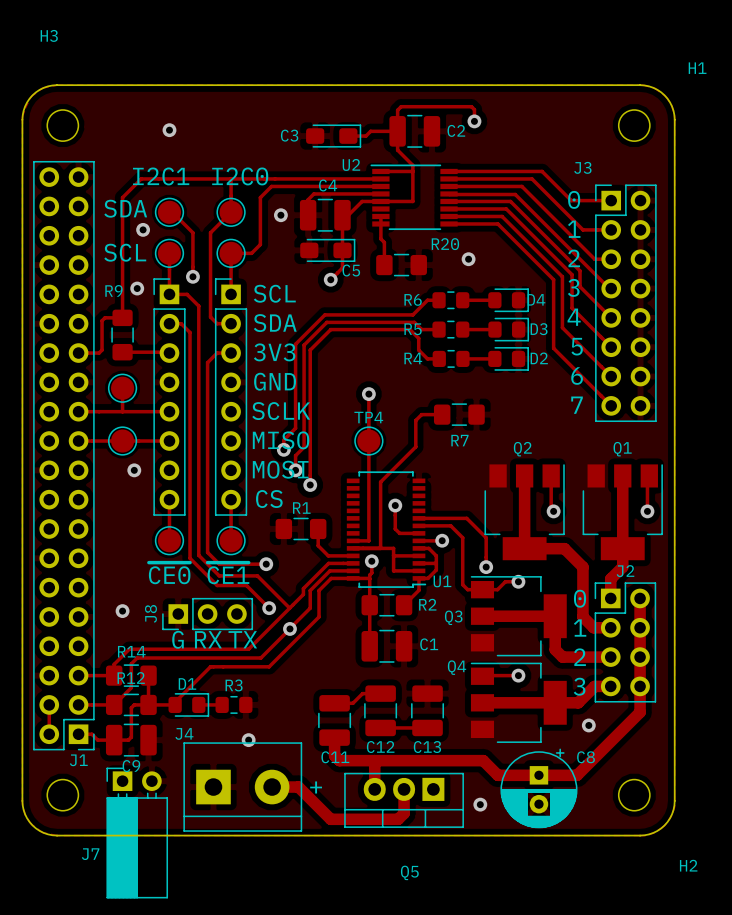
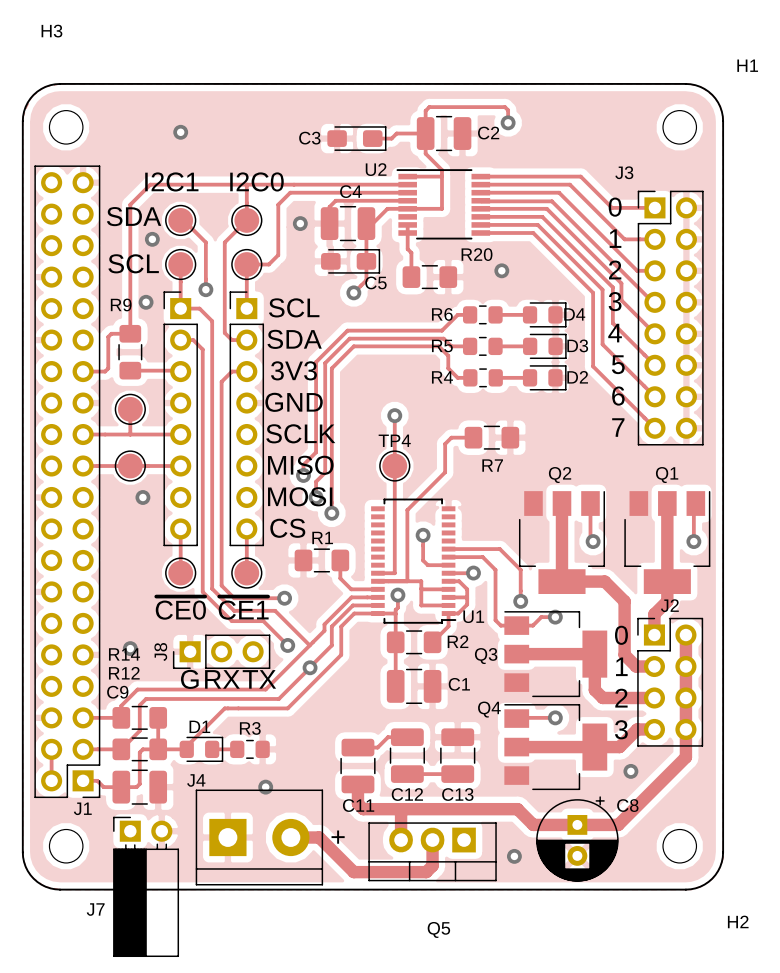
R14 name position: R14 (131, 651) -> R14 (124, 654)
R12 name position: R12 (131, 678) -> R12 (124, 673)
C9 name position: C9 (131, 766) -> C9 (117, 692)

